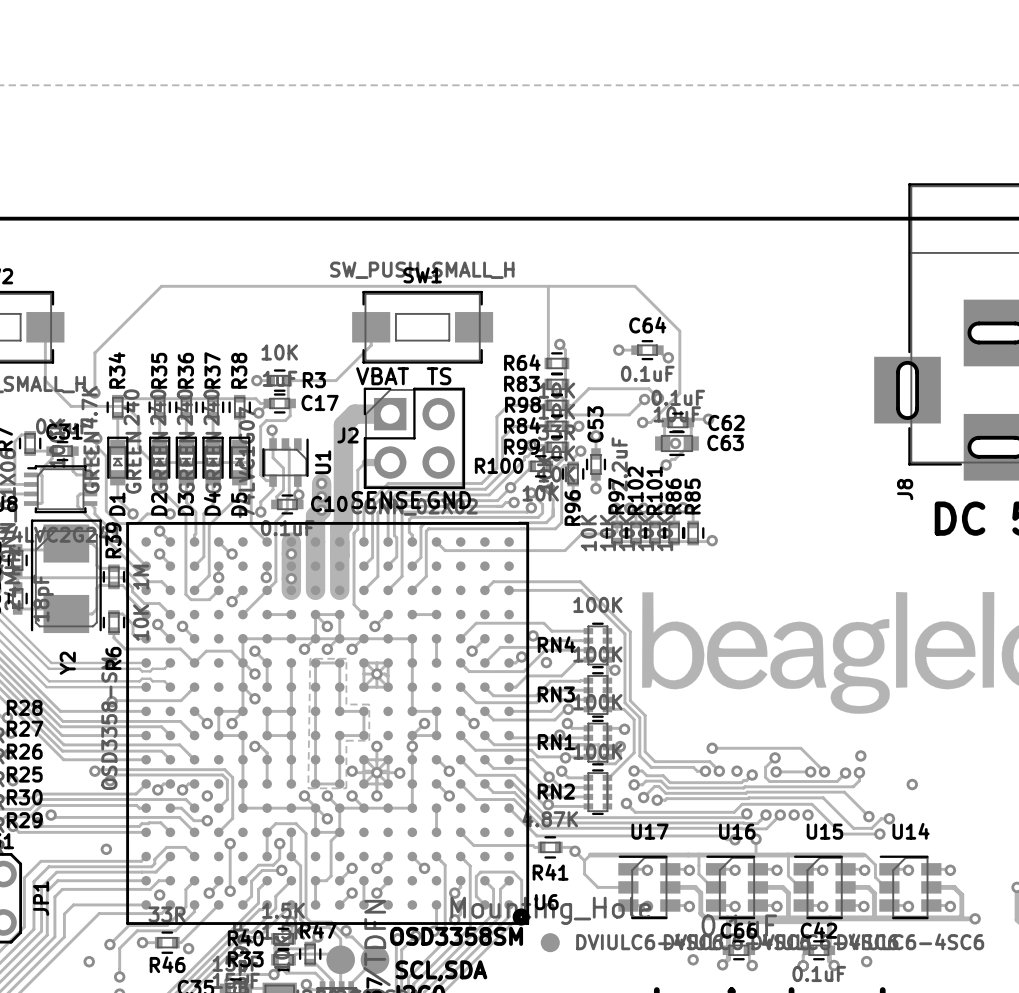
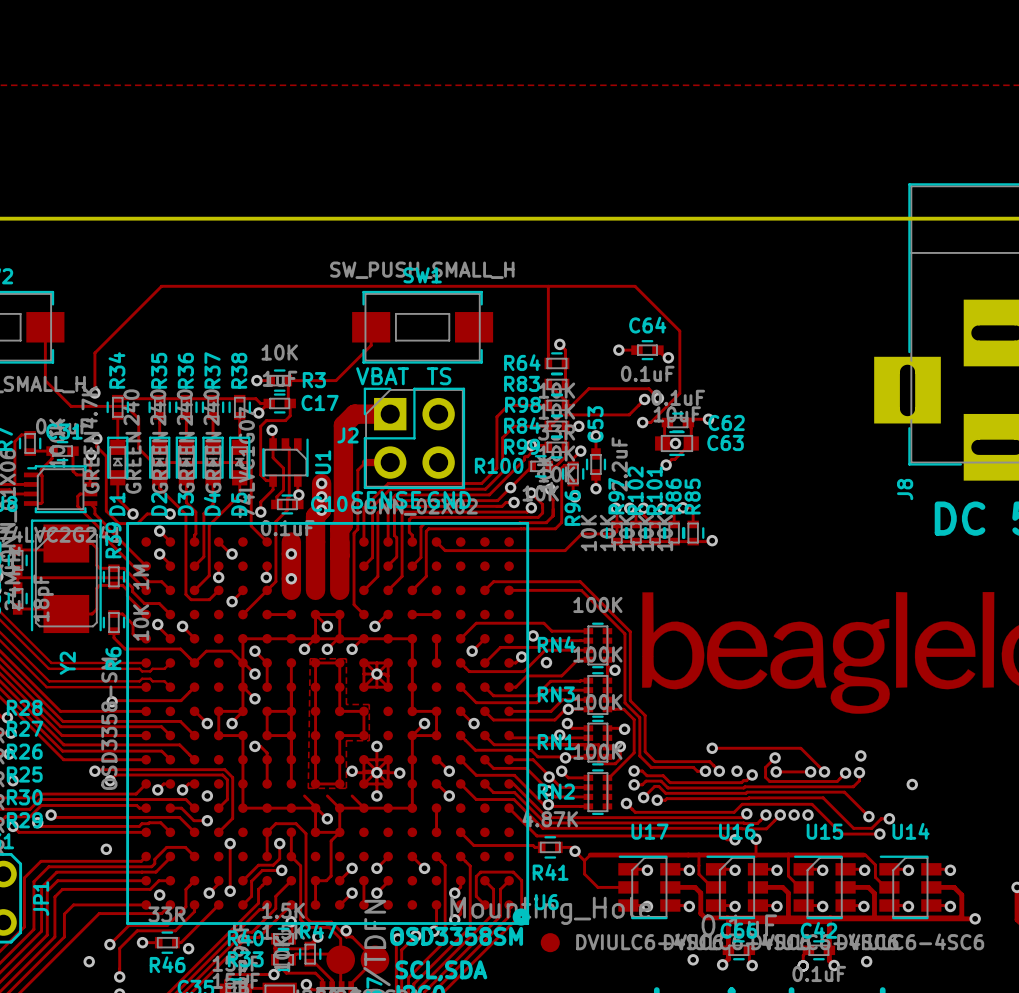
via: (412, 746) -> none
via: (304, 795) -> none
via: (327, 795) -> none
via: (352, 795) -> none

